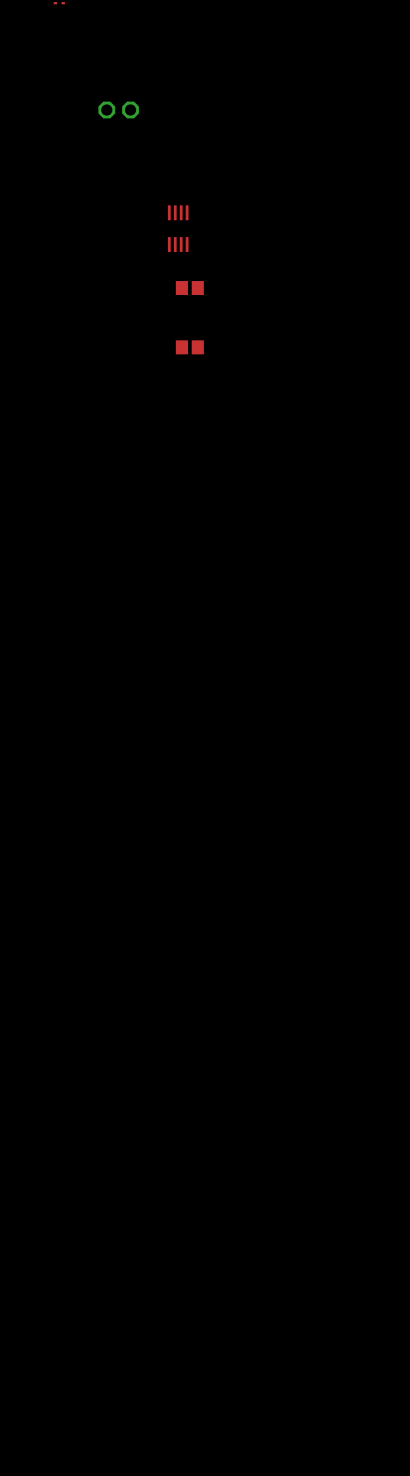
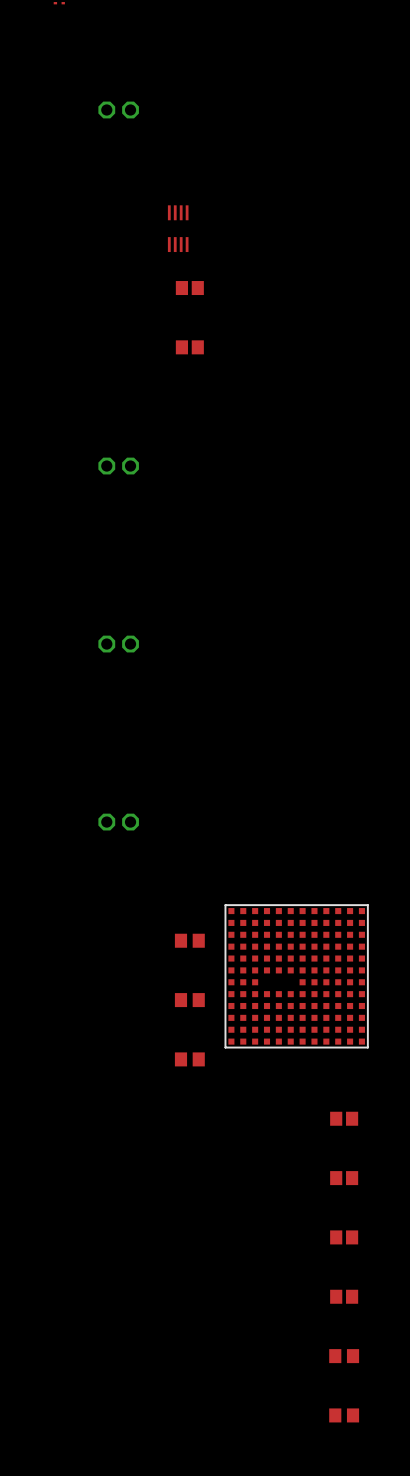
part: none -> (118, 466)
part: none -> (118, 644)
part: none -> (118, 822)
part: none -> (189, 940)
part: none -> (296, 976)
part: none -> (189, 1000)
part: none -> (189, 1059)
part: none -> (344, 1118)
part: none -> (344, 1178)
part: none -> (344, 1237)
part: none -> (344, 1296)
part: none -> (344, 1356)
part: none -> (344, 1415)

